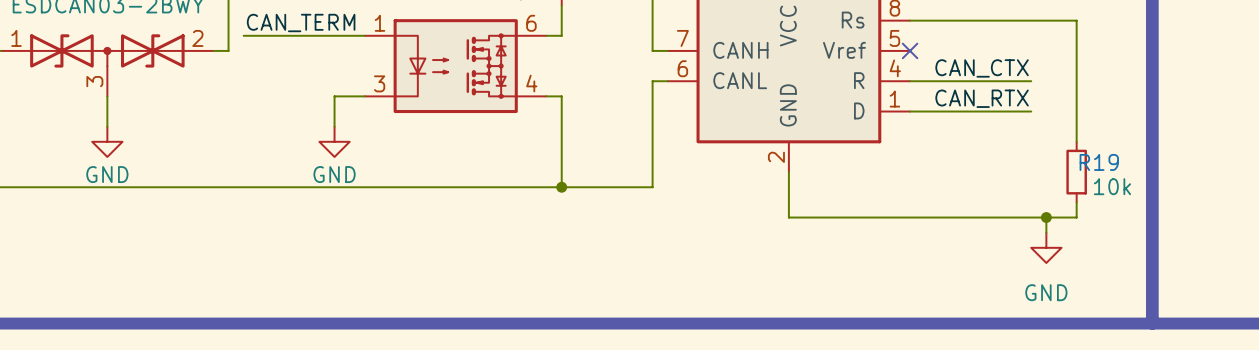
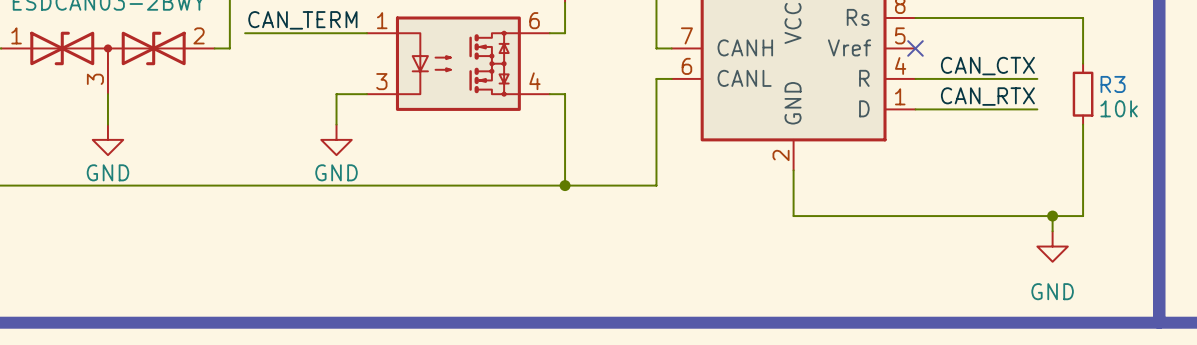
wire: (1076, 66) (1076, 126) -> (1083, 139) (1083, 200)
R3: none -> 10k (1083, 94)
R19: 10k (1076, 172) -> none

